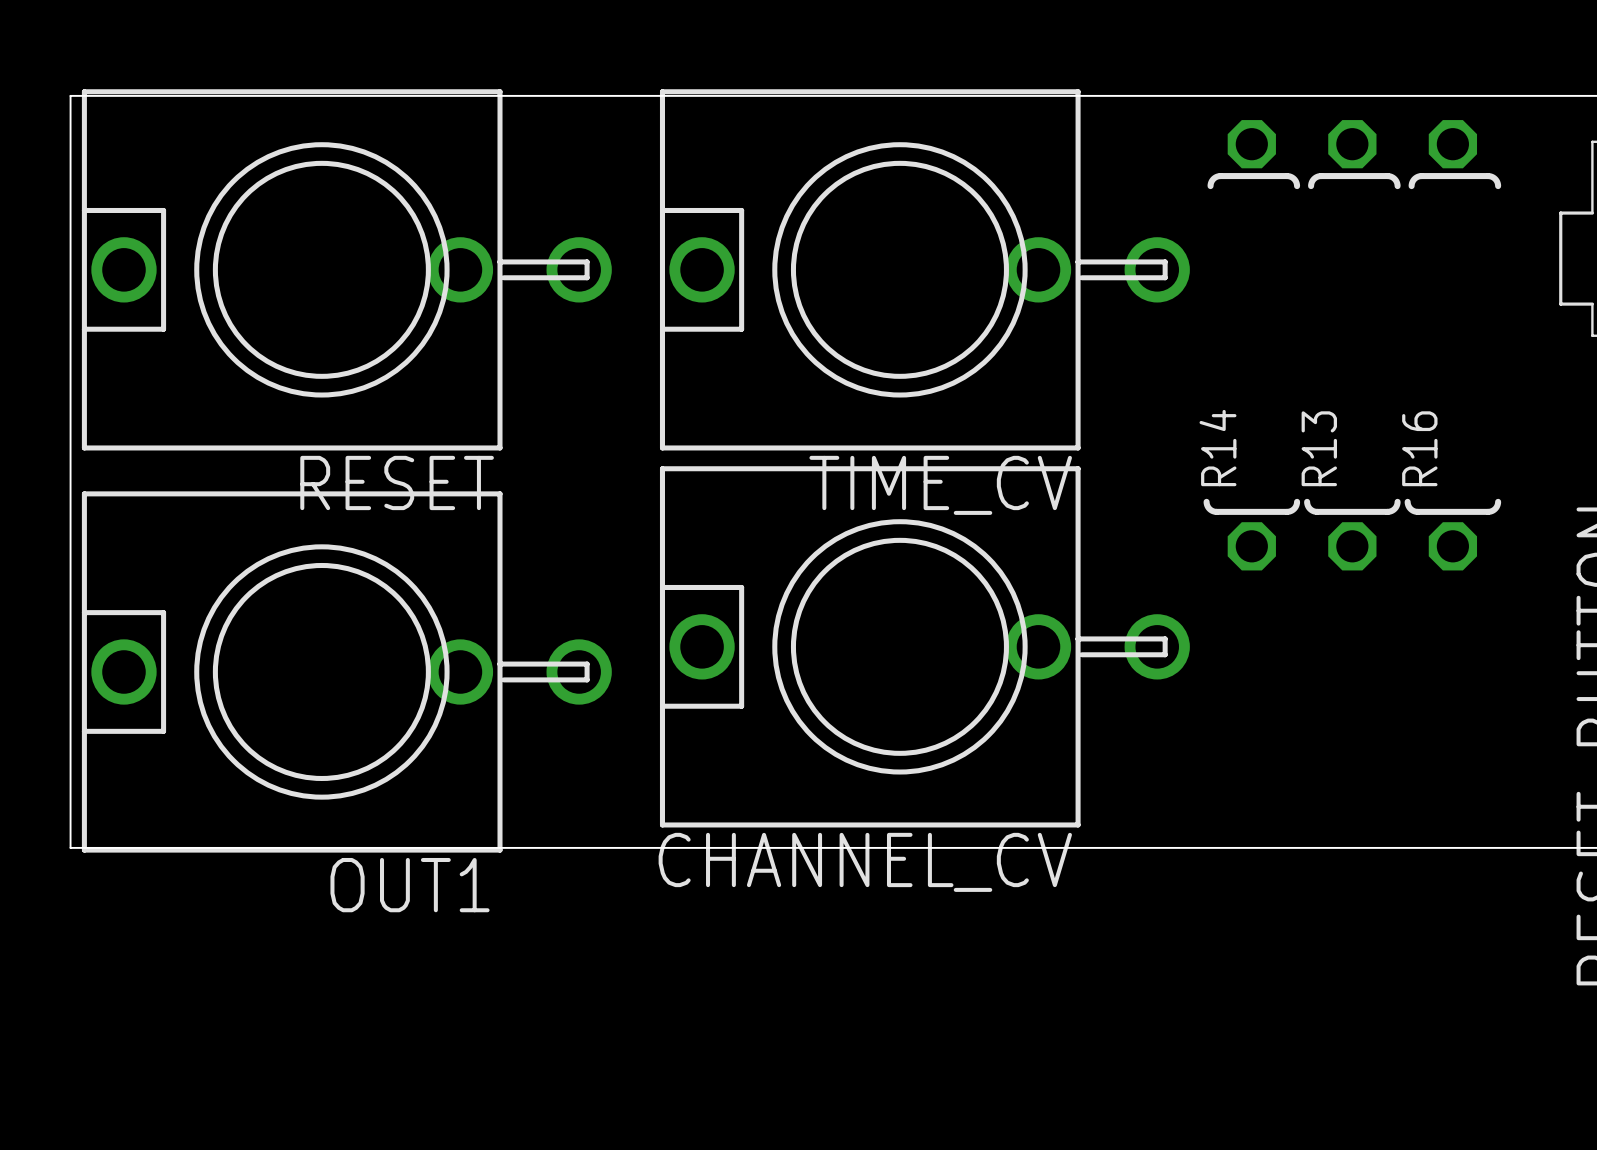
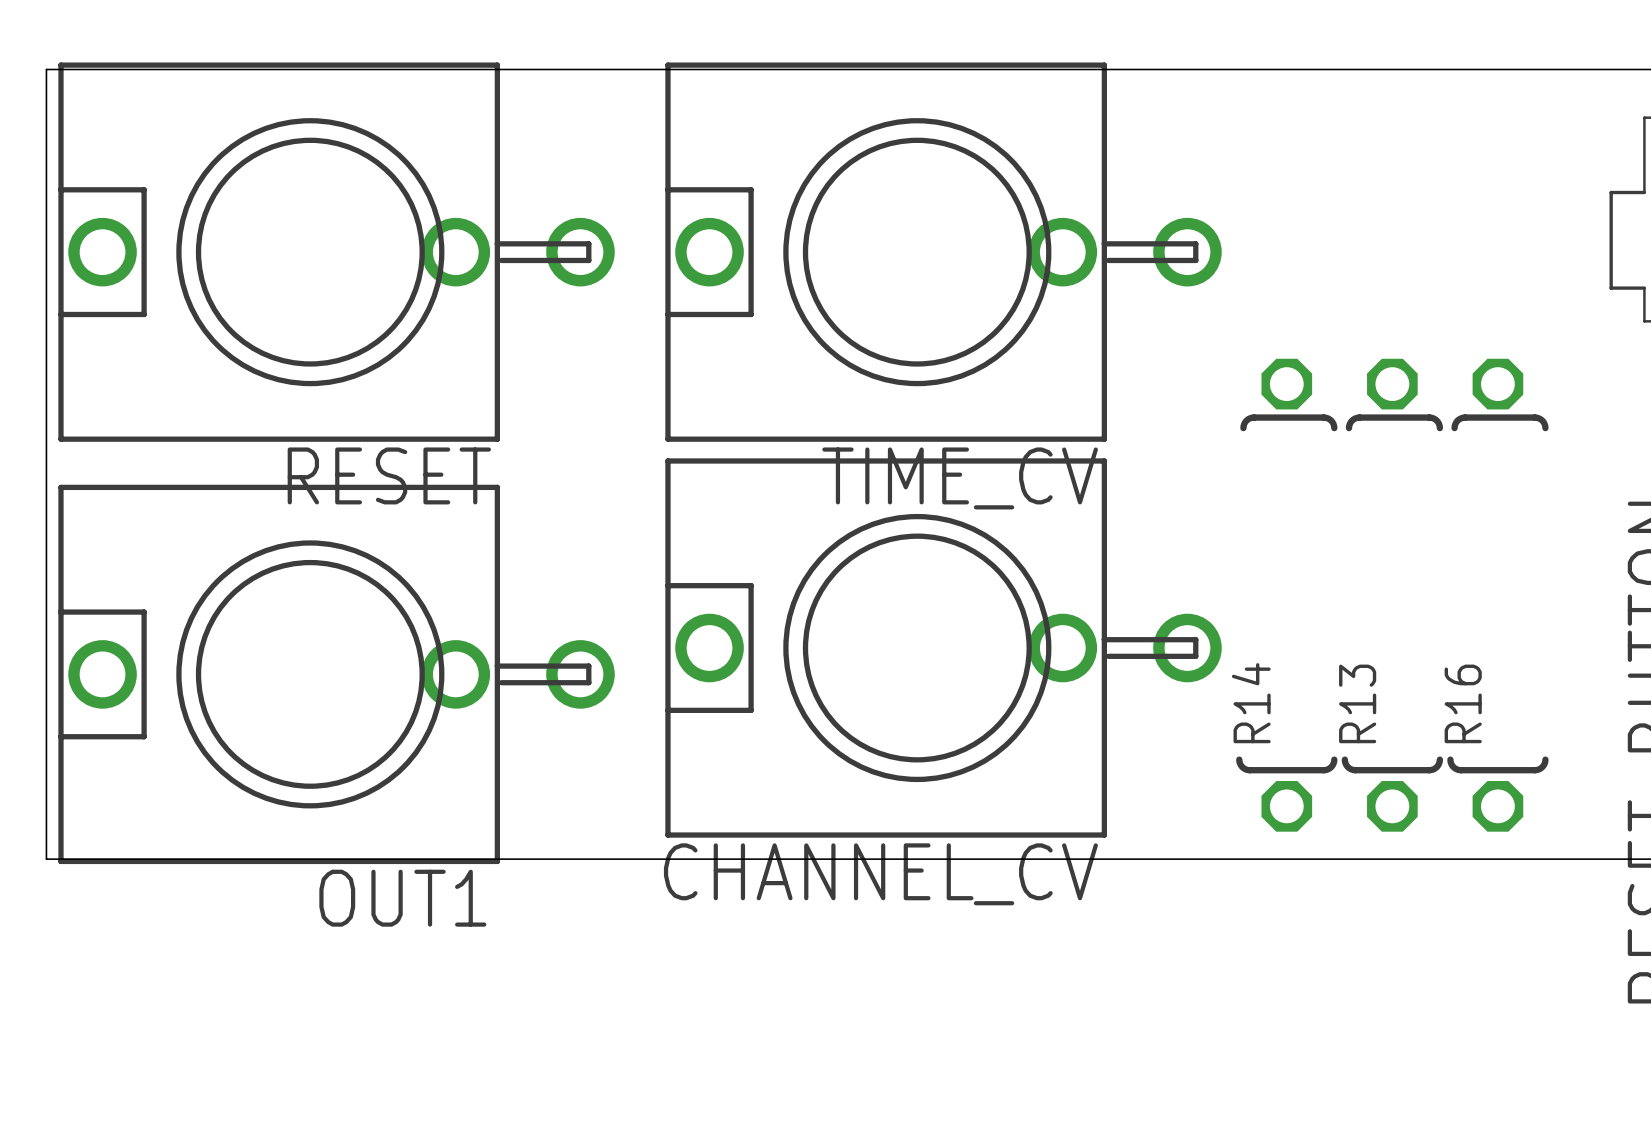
R14 position: (1251, 345) -> (1286, 595)
R13 position: (1352, 345) -> (1392, 595)
R16 position: (1452, 345) -> (1497, 595)

